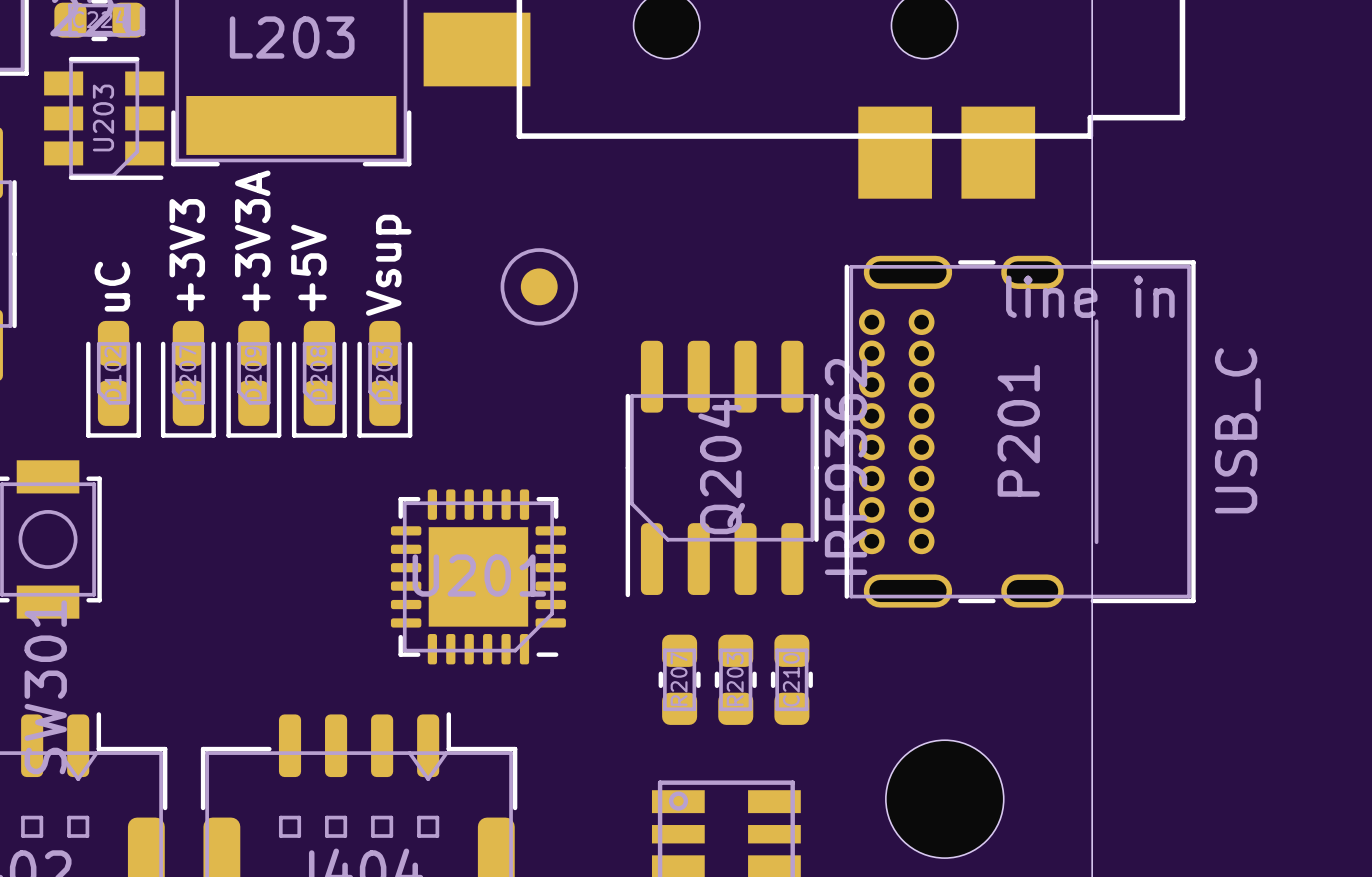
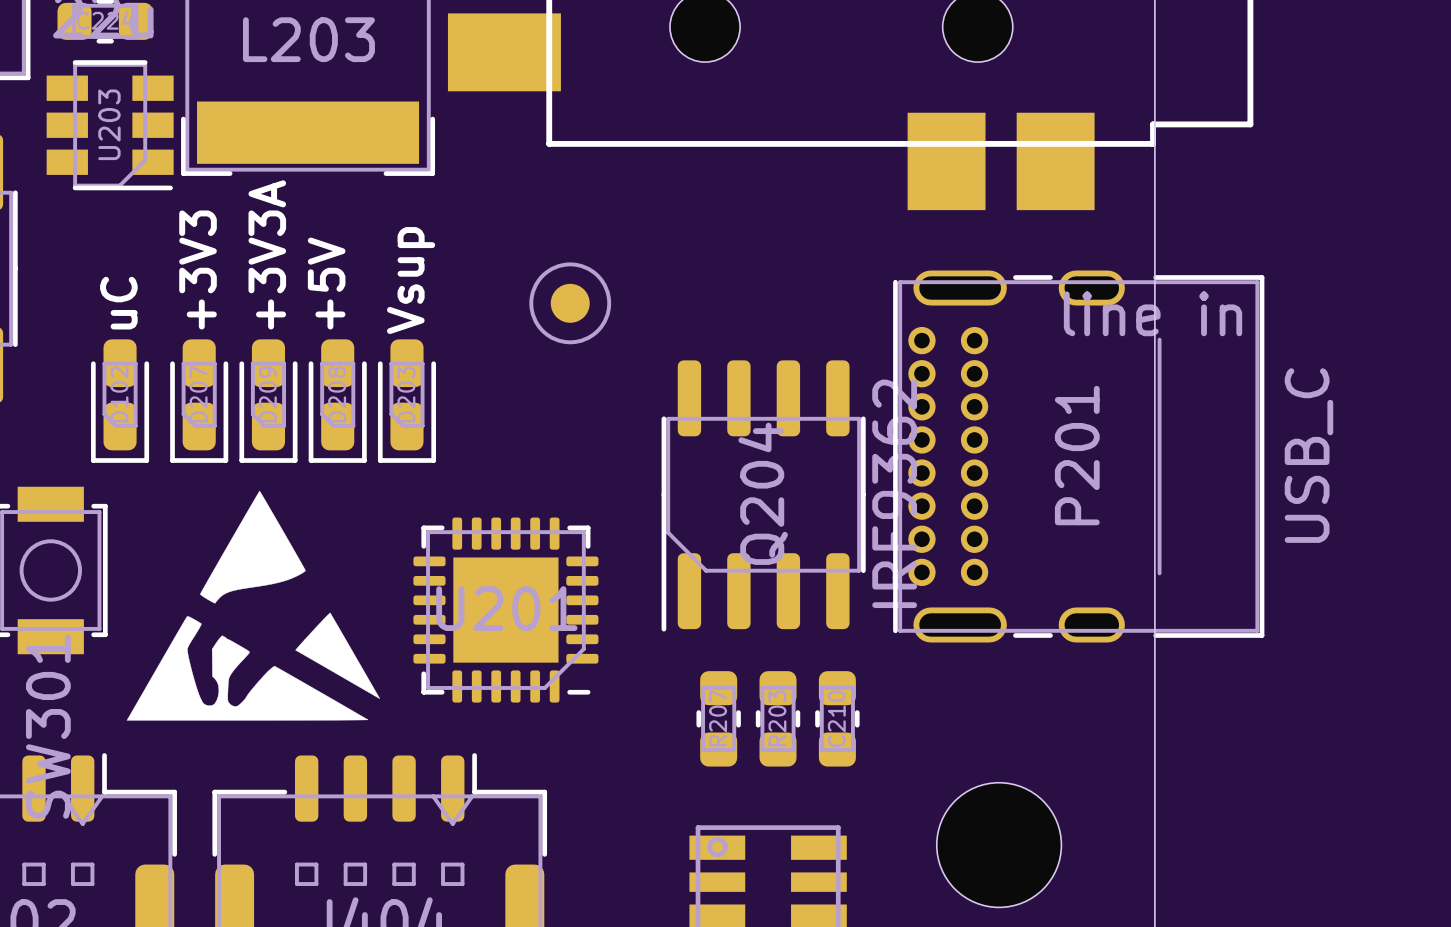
drawing: none -> [126, 490, 380, 721]

